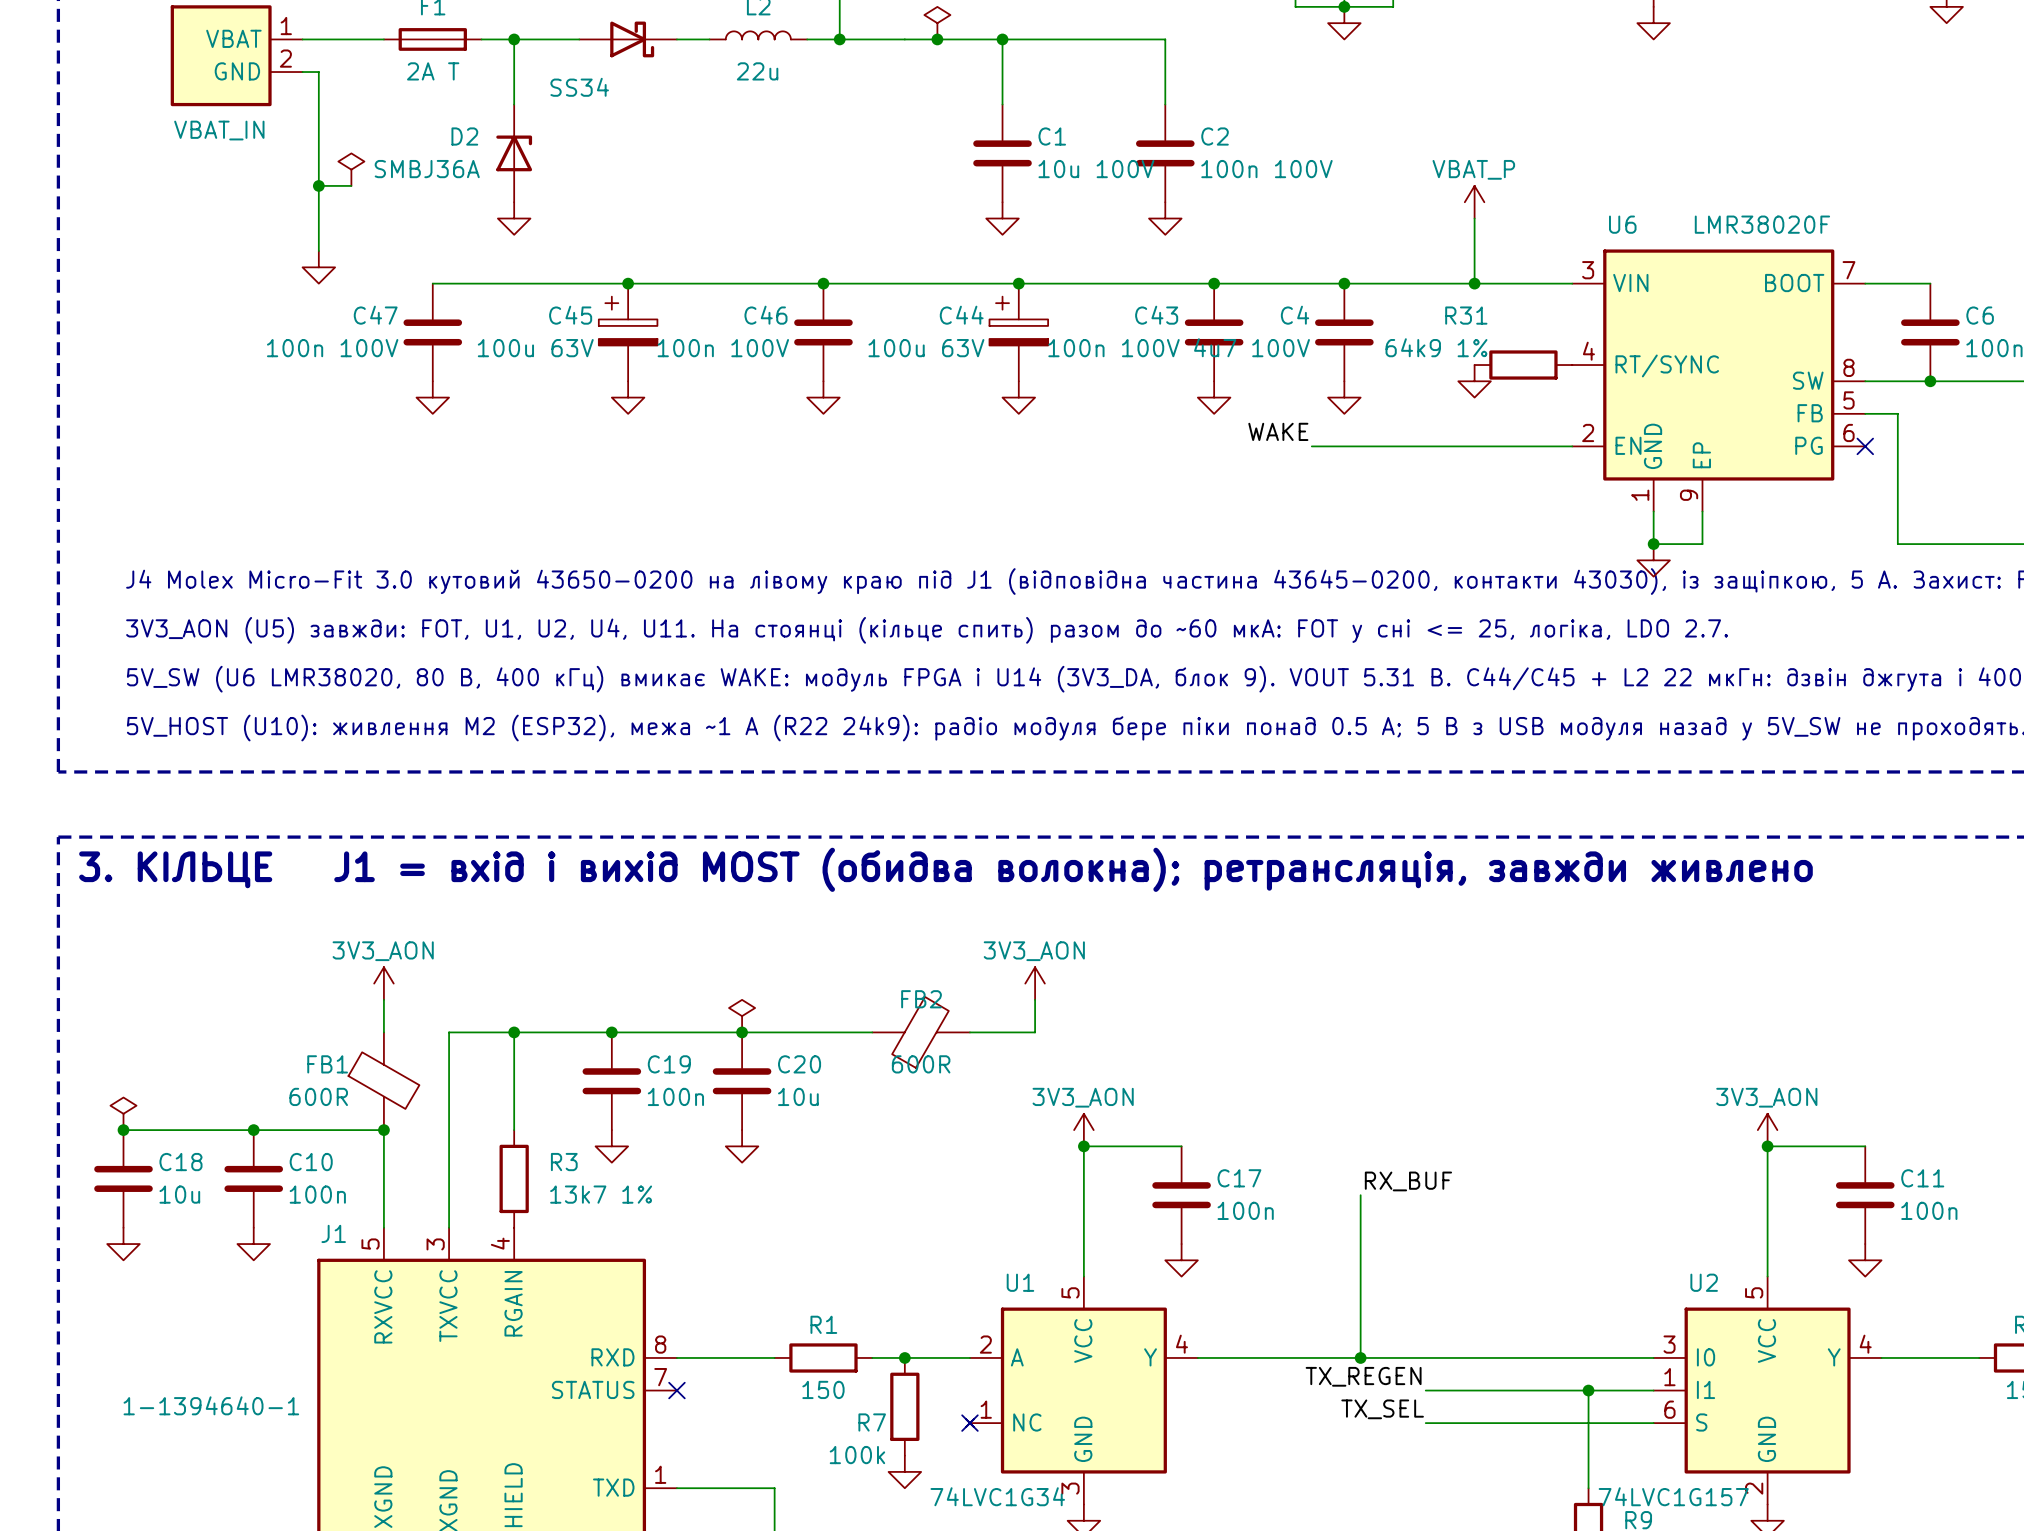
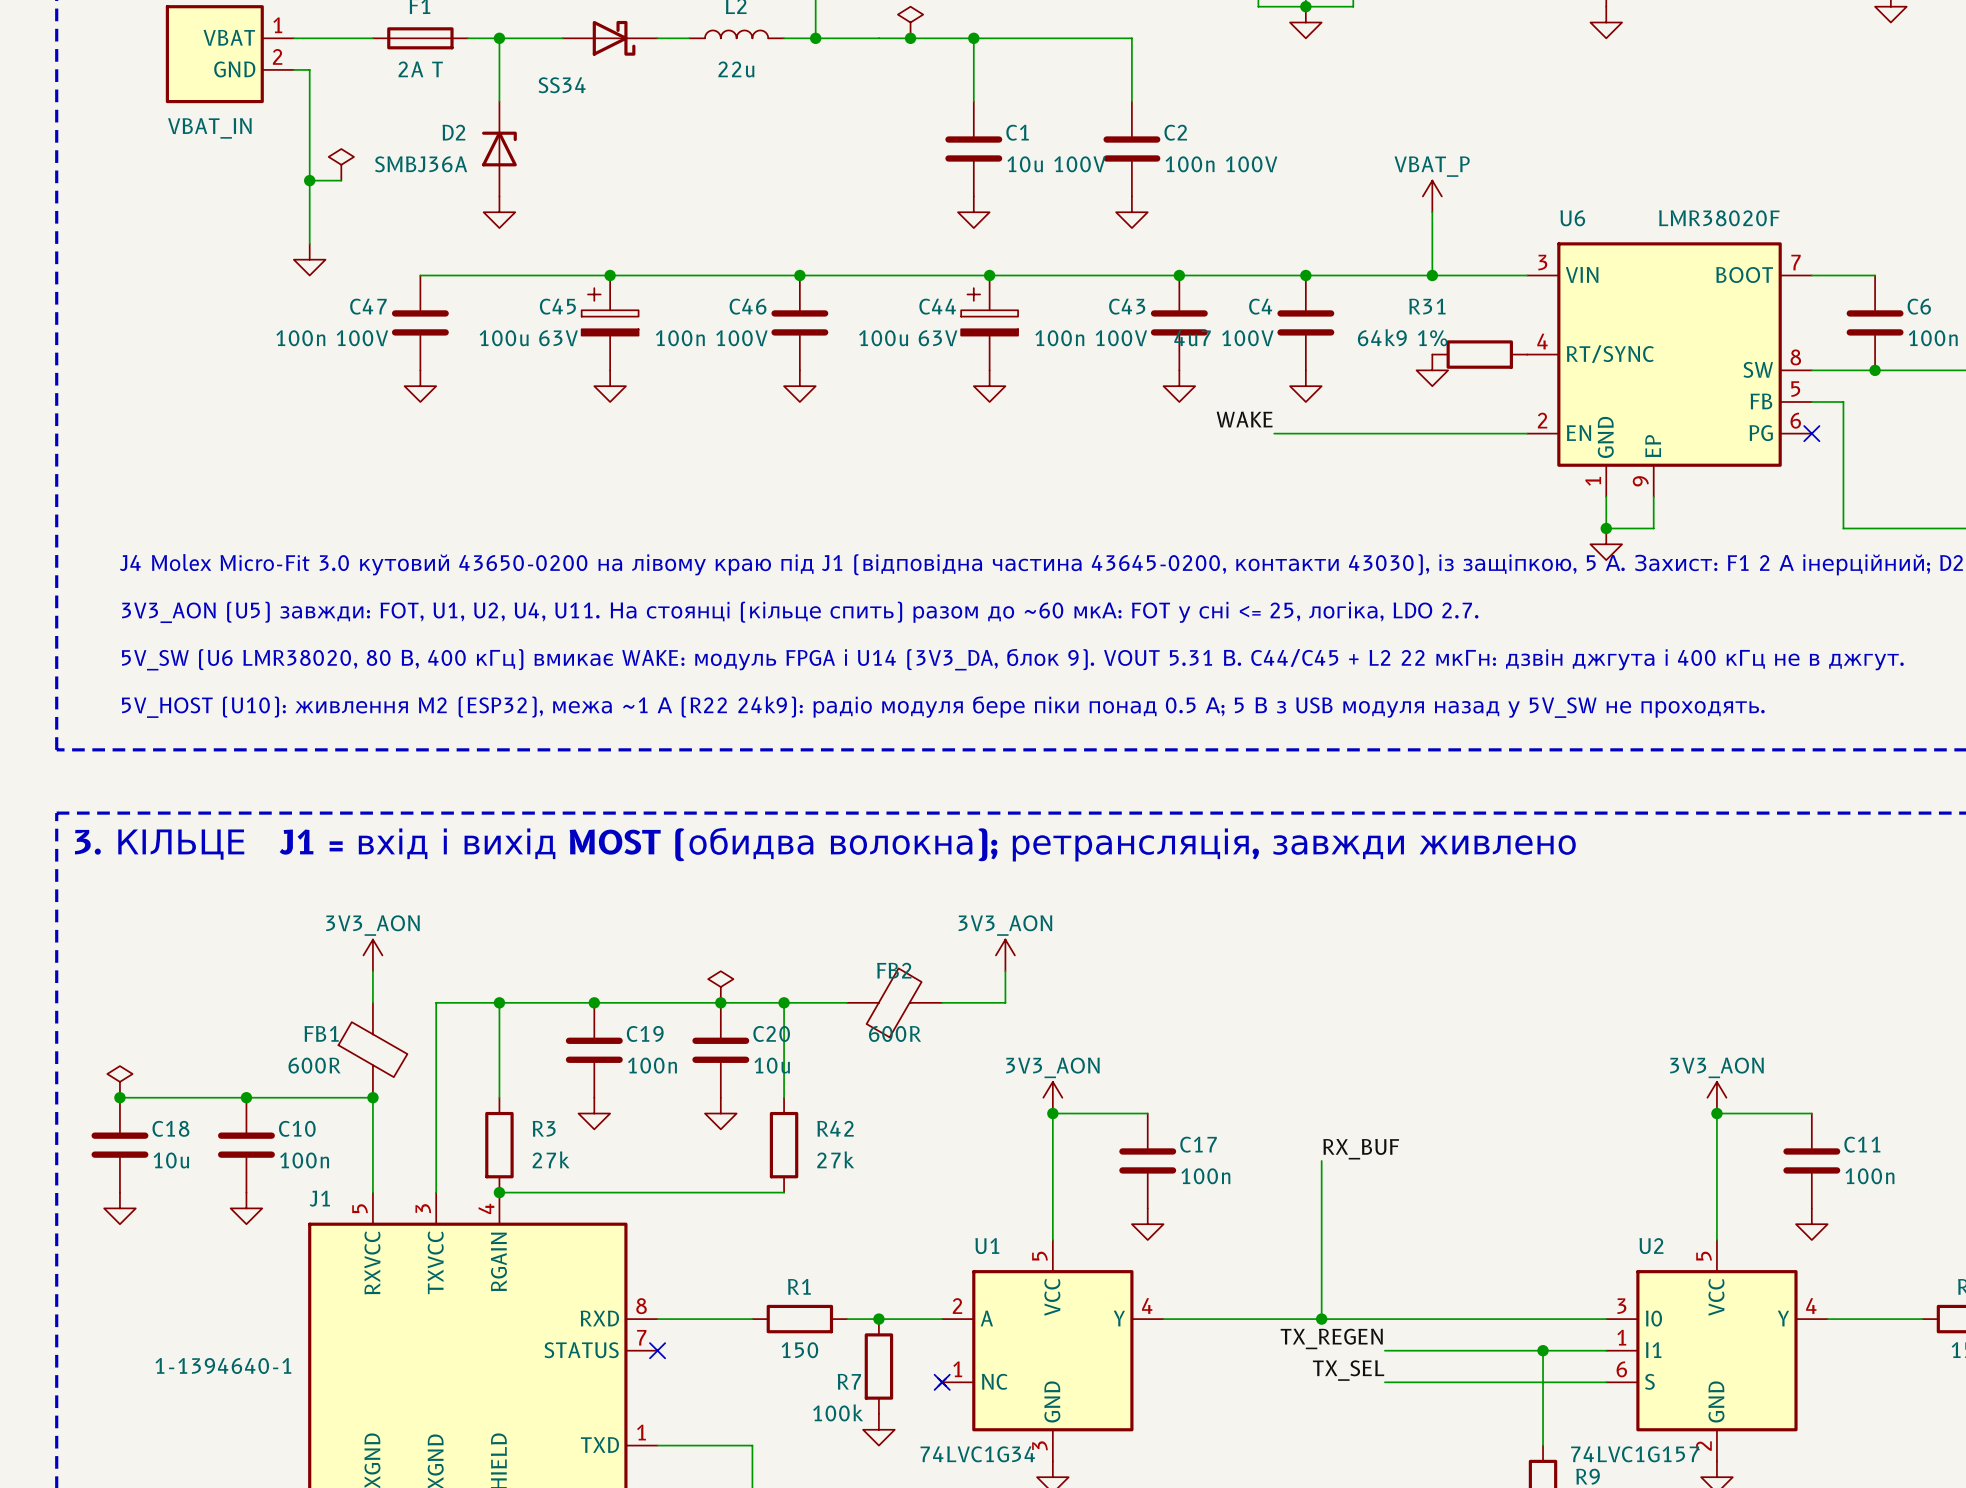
wire: none -> (784, 1002) (784, 1097)
junction: none -> (784, 1002)
R42: none -> 27k (784, 1145)
R3 value: 13k7 1% (601, 1194) -> 27k (551, 1159)
wire: none -> (499, 1192) (784, 1192)
junction: none -> (499, 1192)

